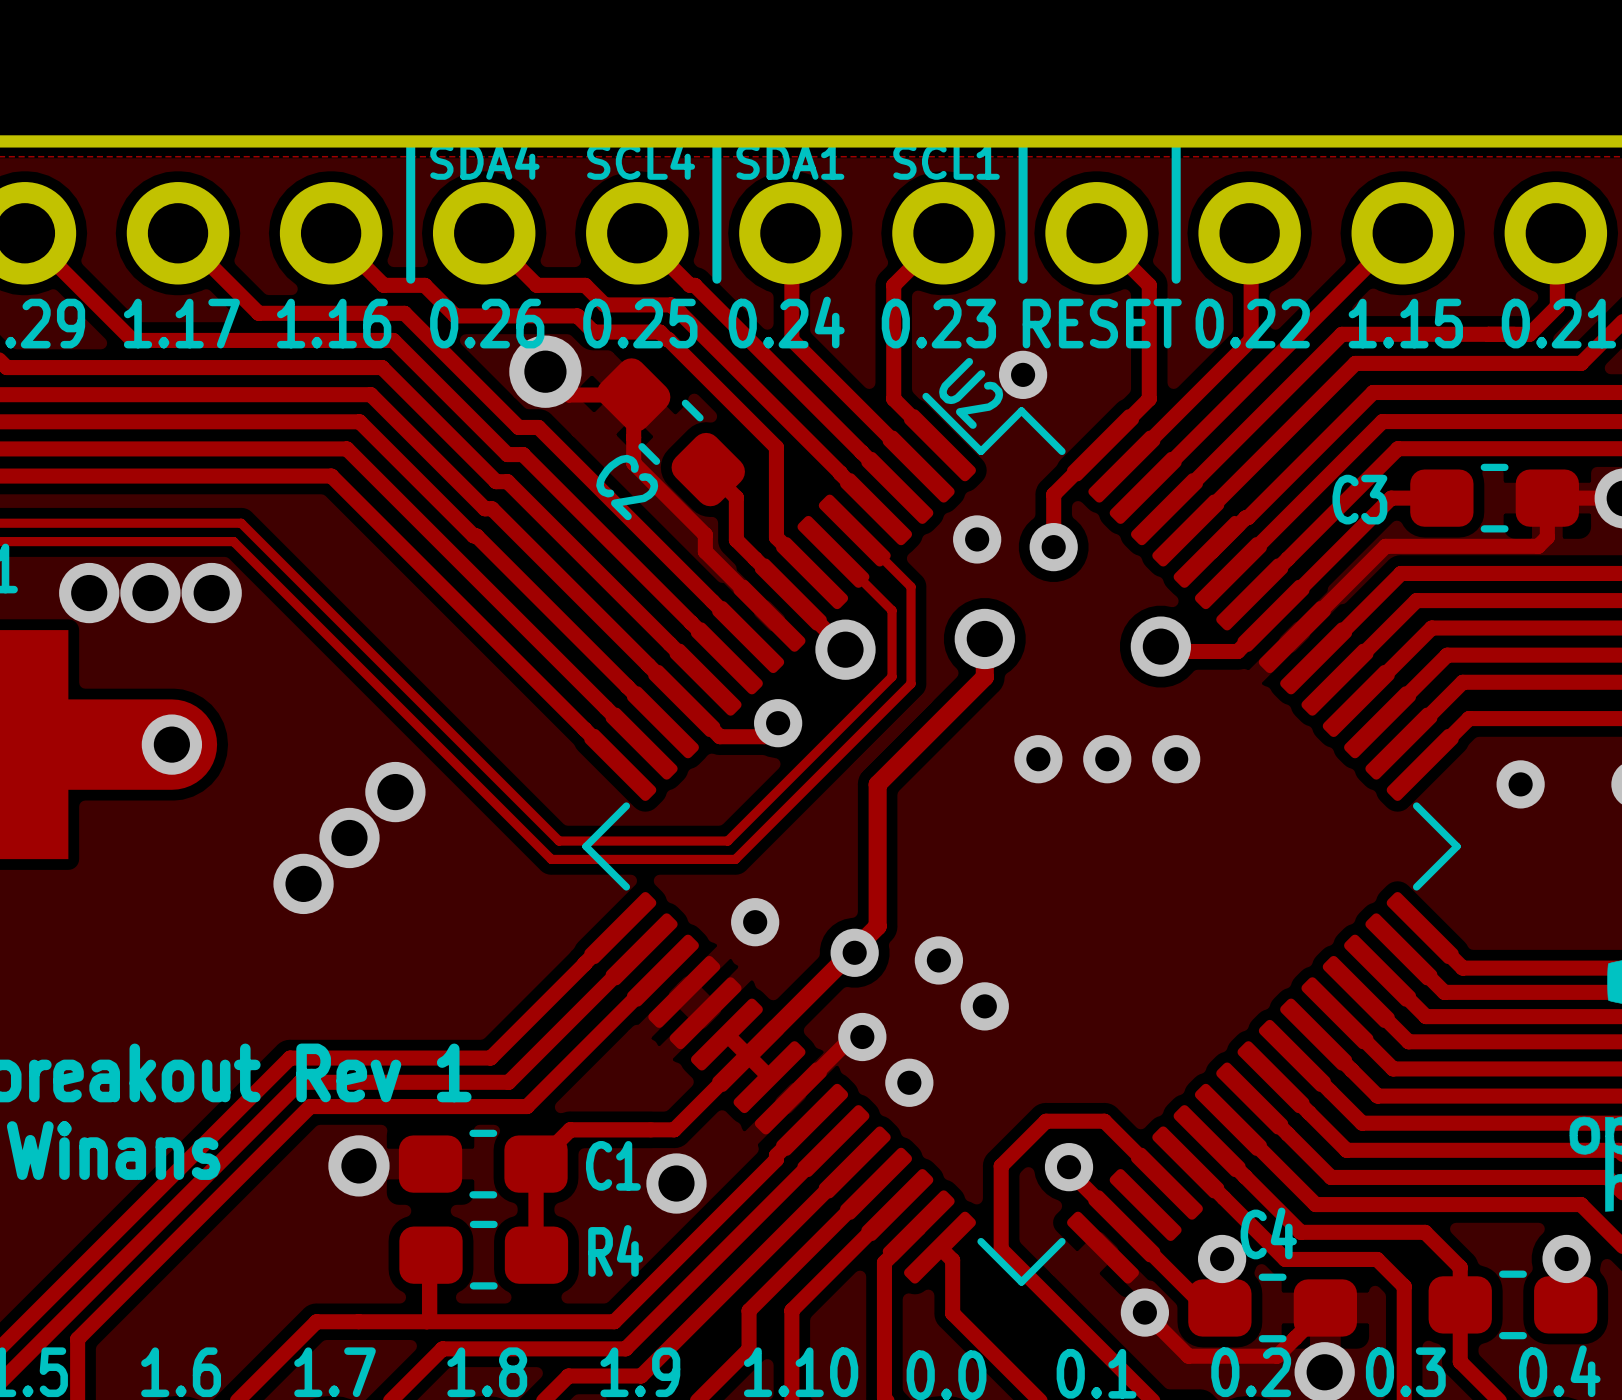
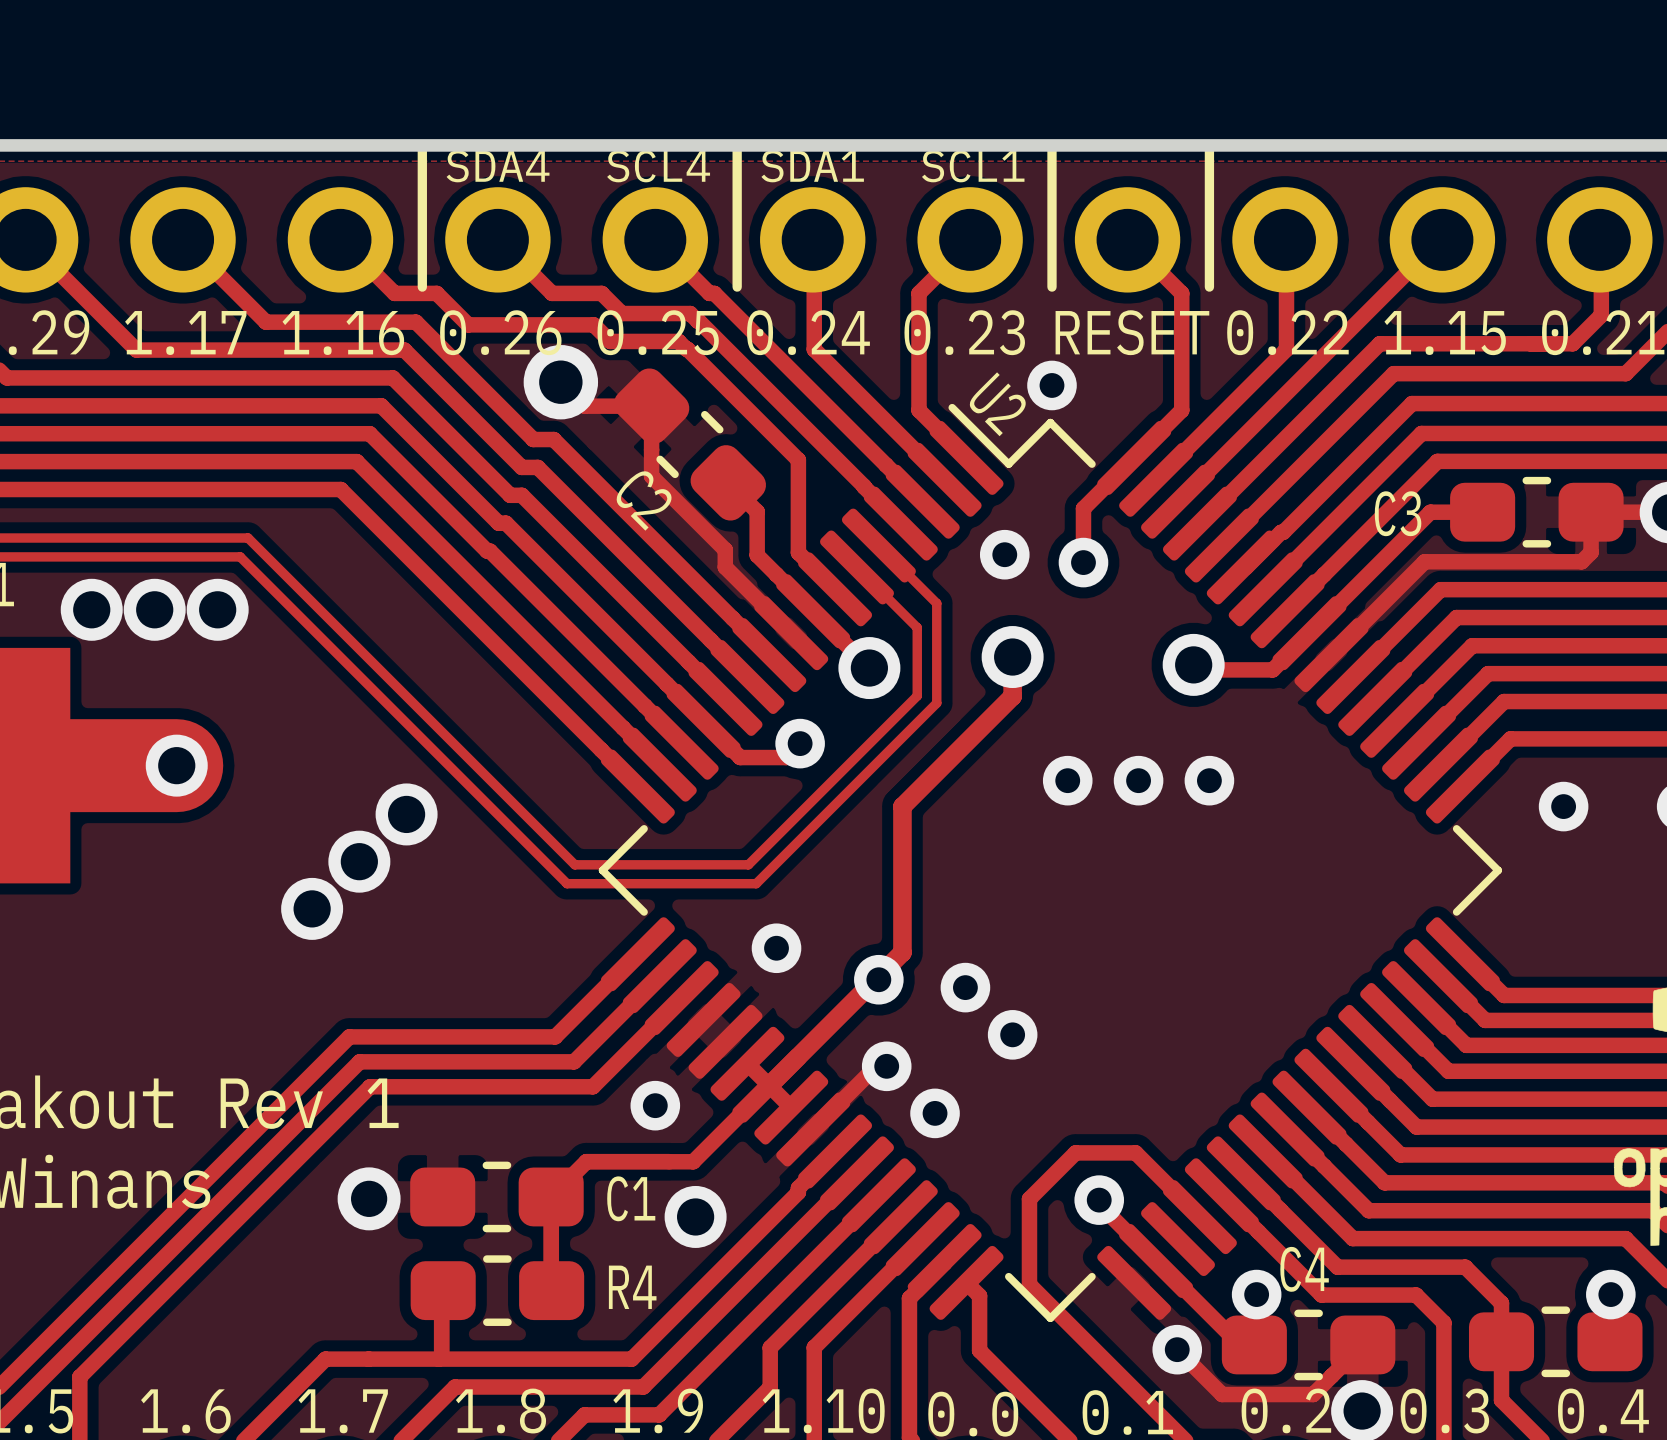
track: (539, 1008) (490, 1058) (290, 1058) -> (555, 1036) (349, 1036) (298, 1087)
track: (558, 1032) (508, 1082) (300, 1082) -> (574, 1061) (359, 1061) (308, 1112)
track: (576, 1056) (527, 1106) (310, 1106) -> (592, 1086) (370, 1086) (319, 1137)
via: none -> (655, 1105)

